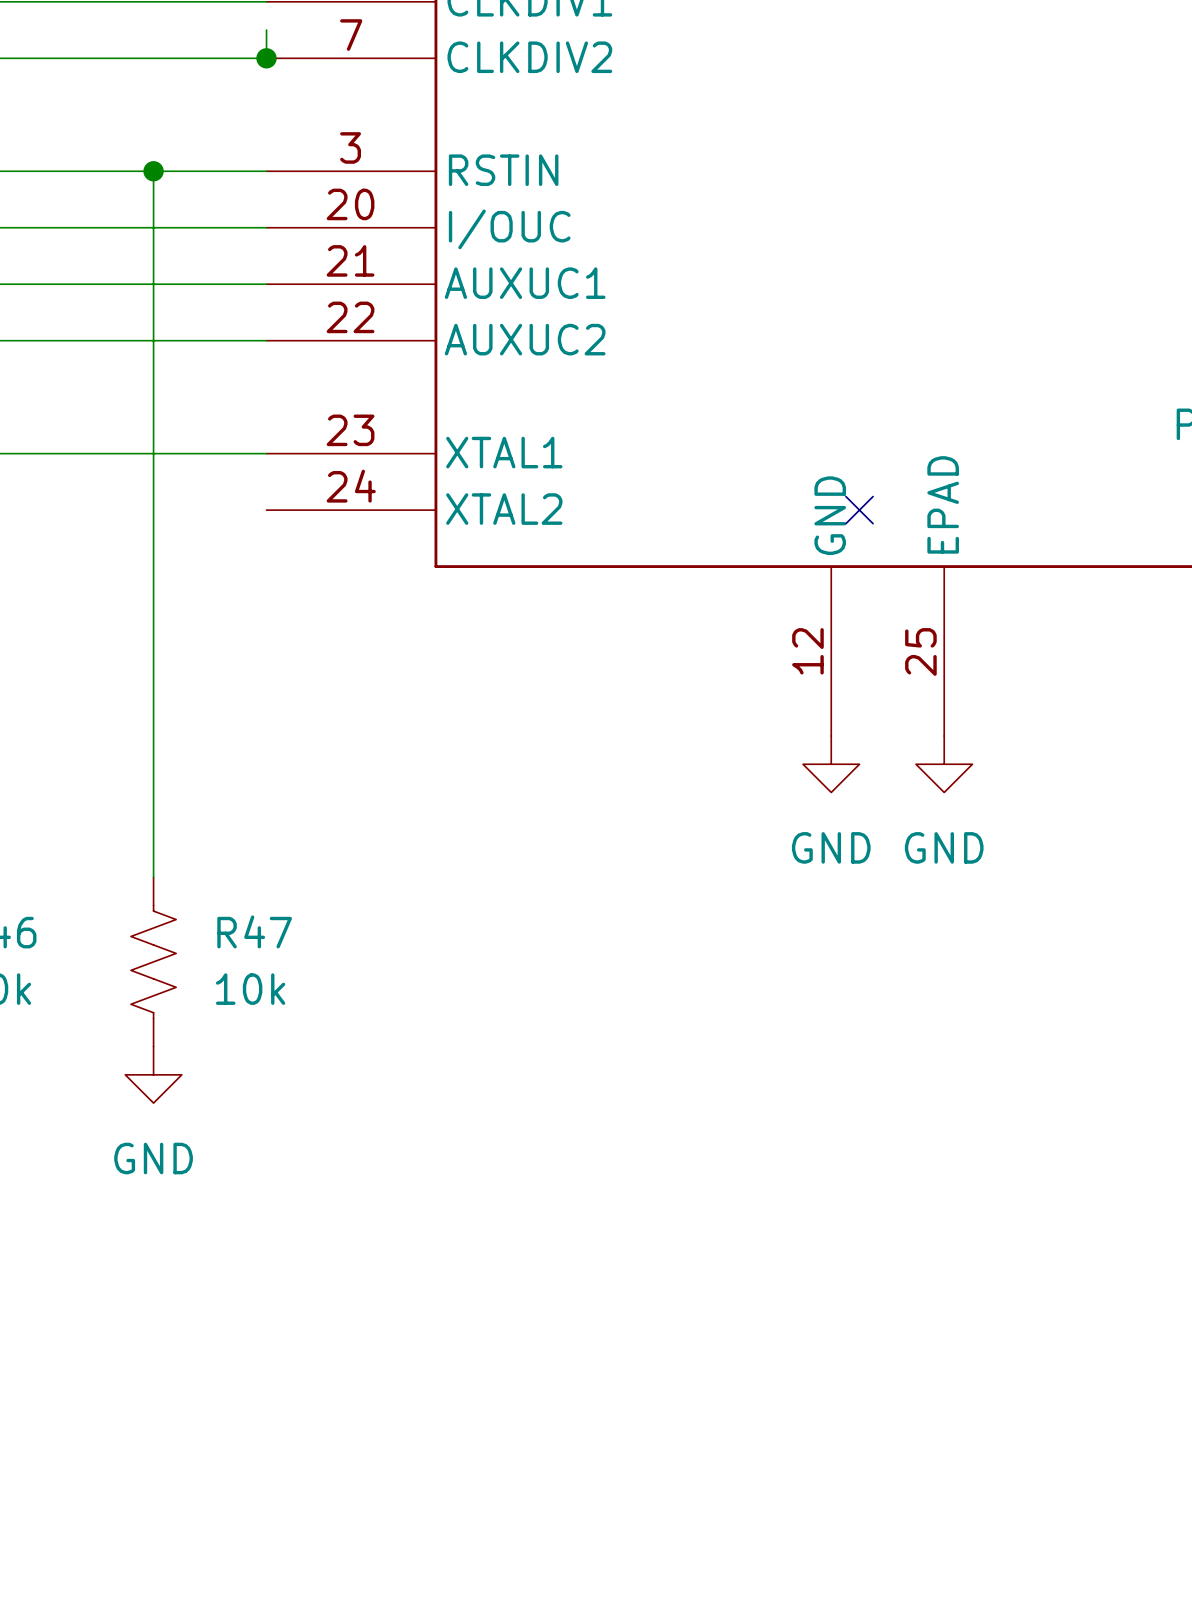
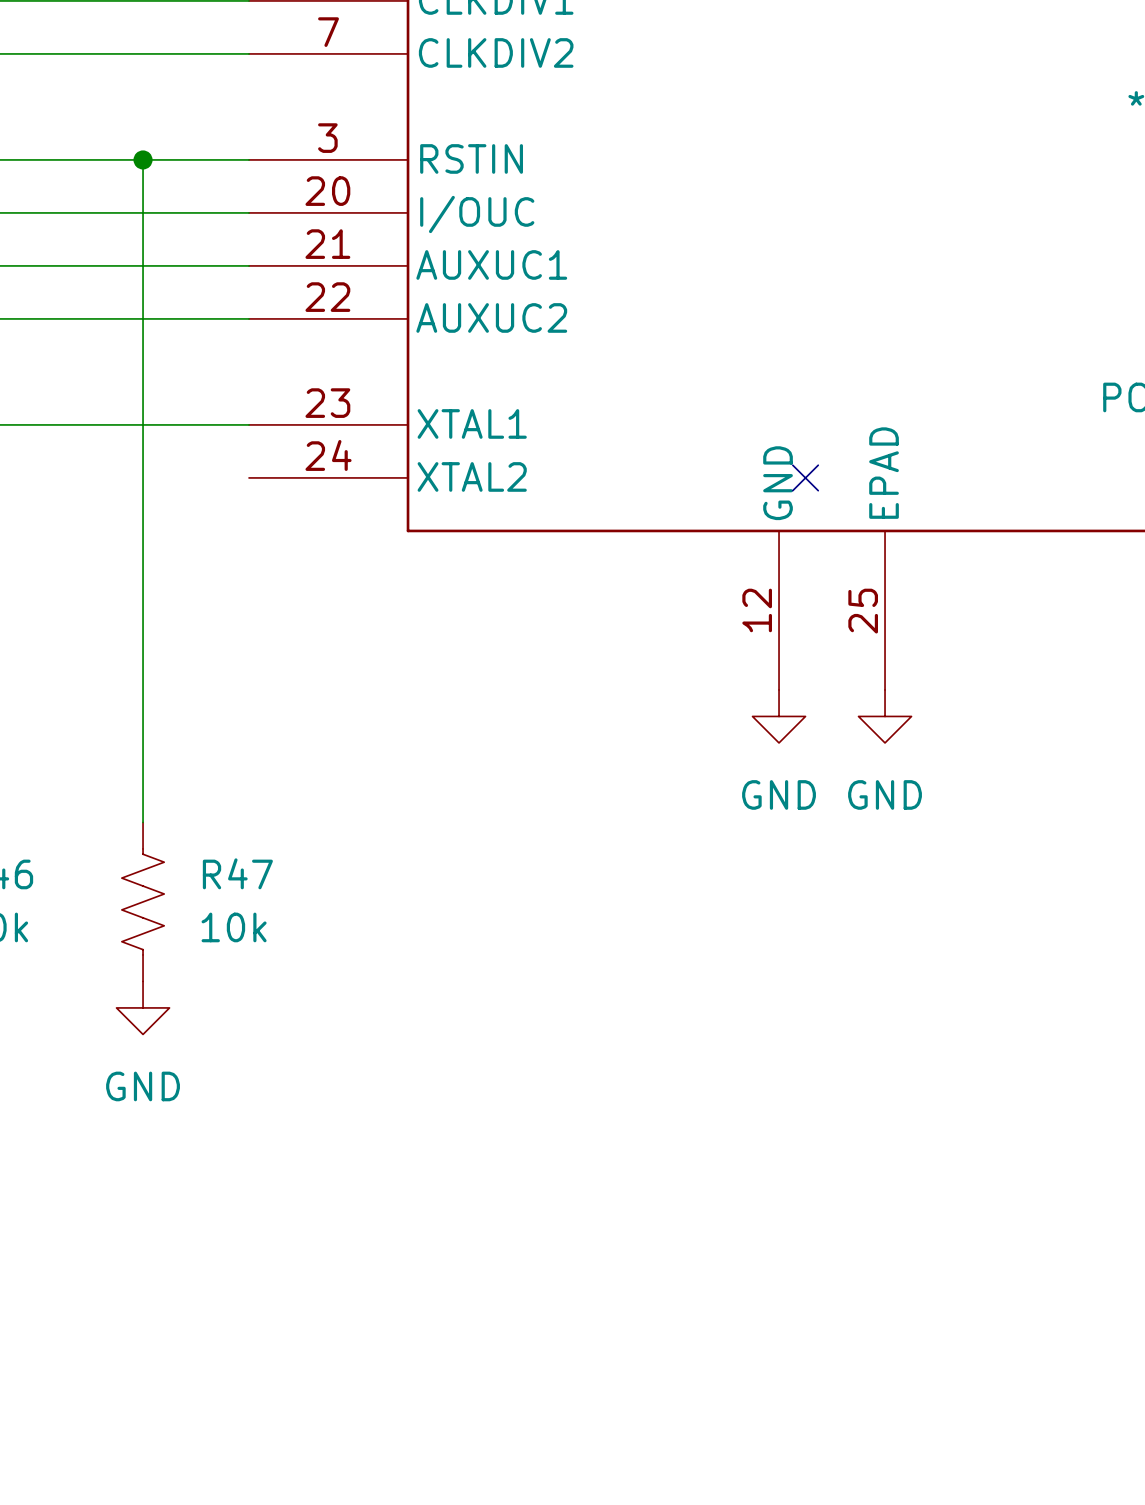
wire: (266, 30) (266, 58) -> none
junction: (266, 58) -> none

